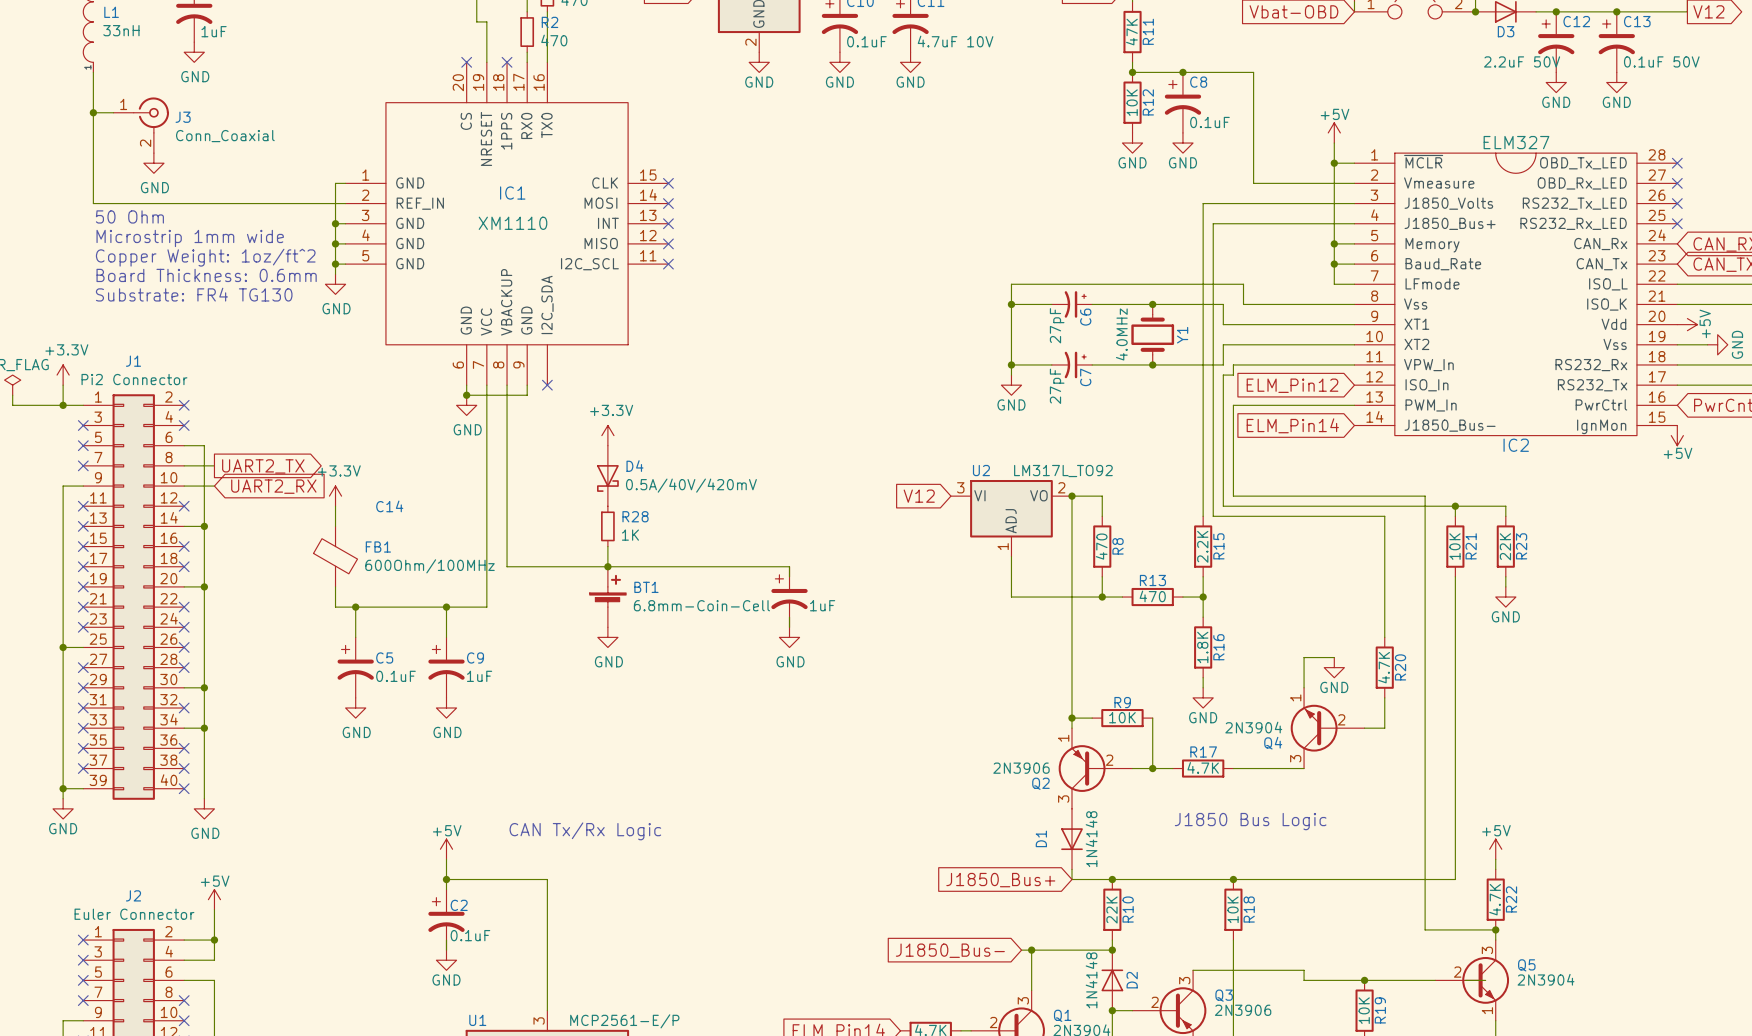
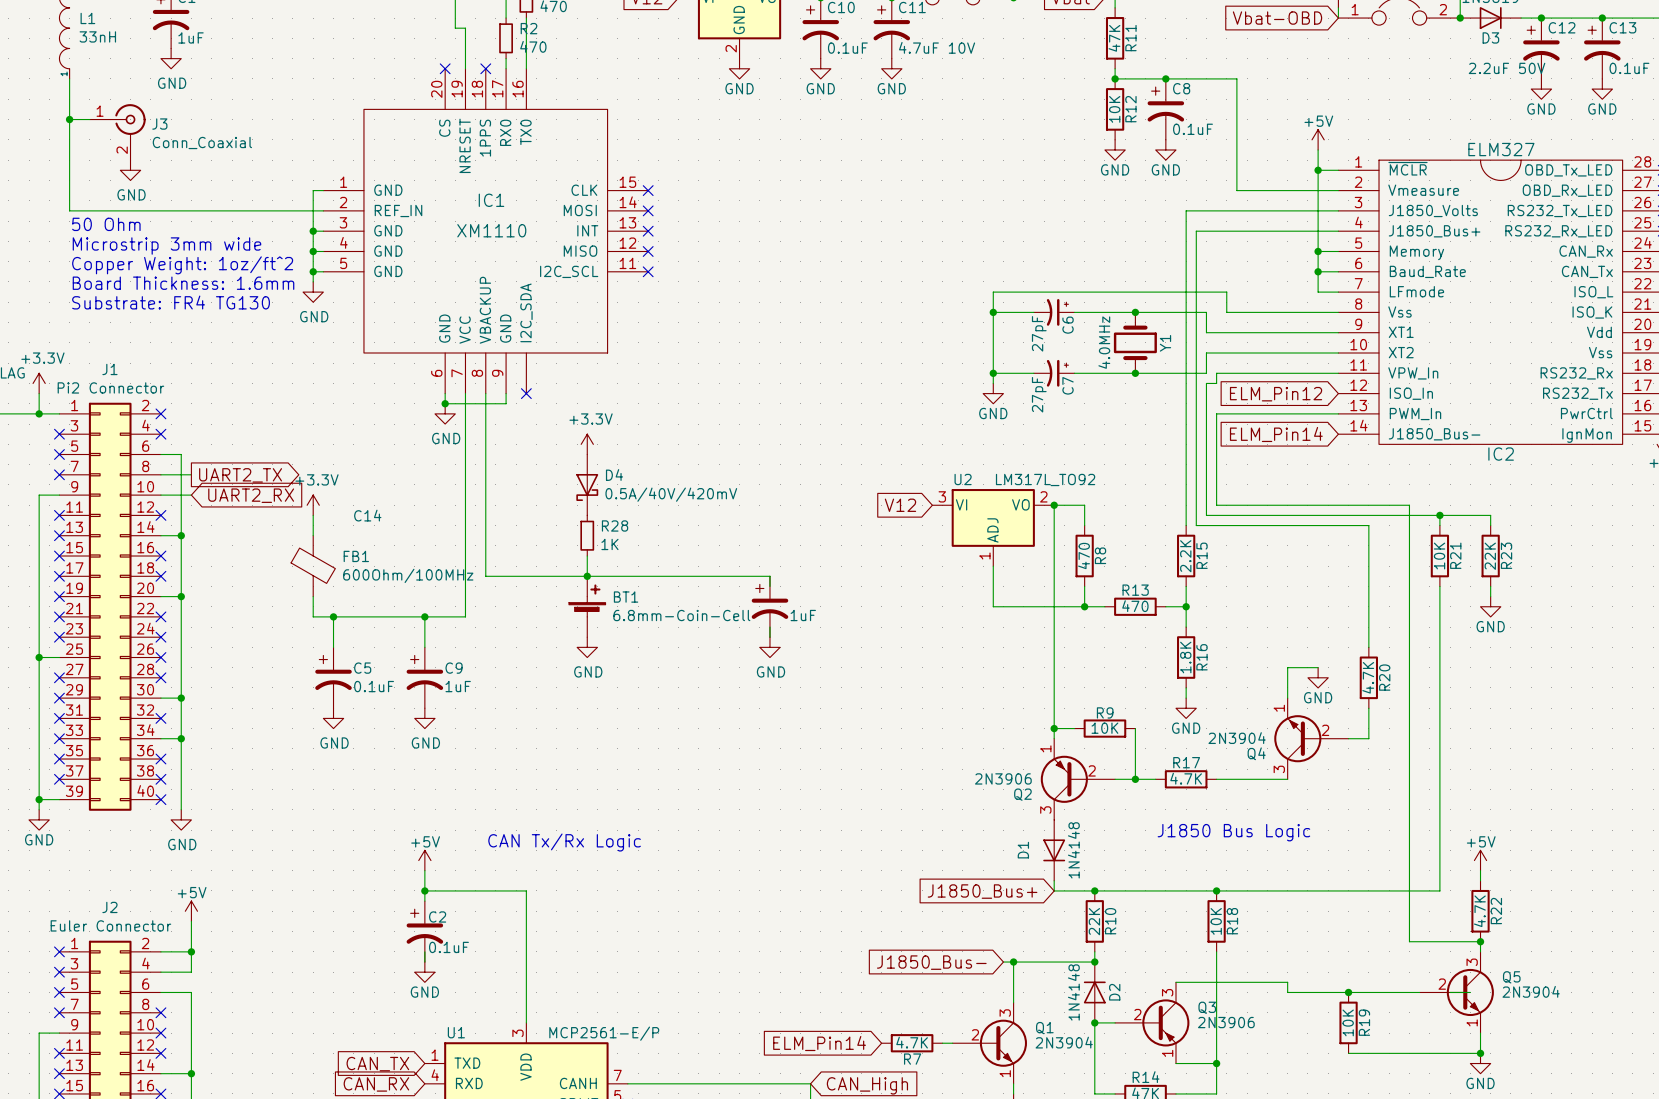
text: Microstrip 1mm wide (190, 238) -> Microstrip 3mm wide (166, 246)
text: Board Thickness: 0.6mm (206, 275) -> Board Thickness: 1.6mm (183, 283)

